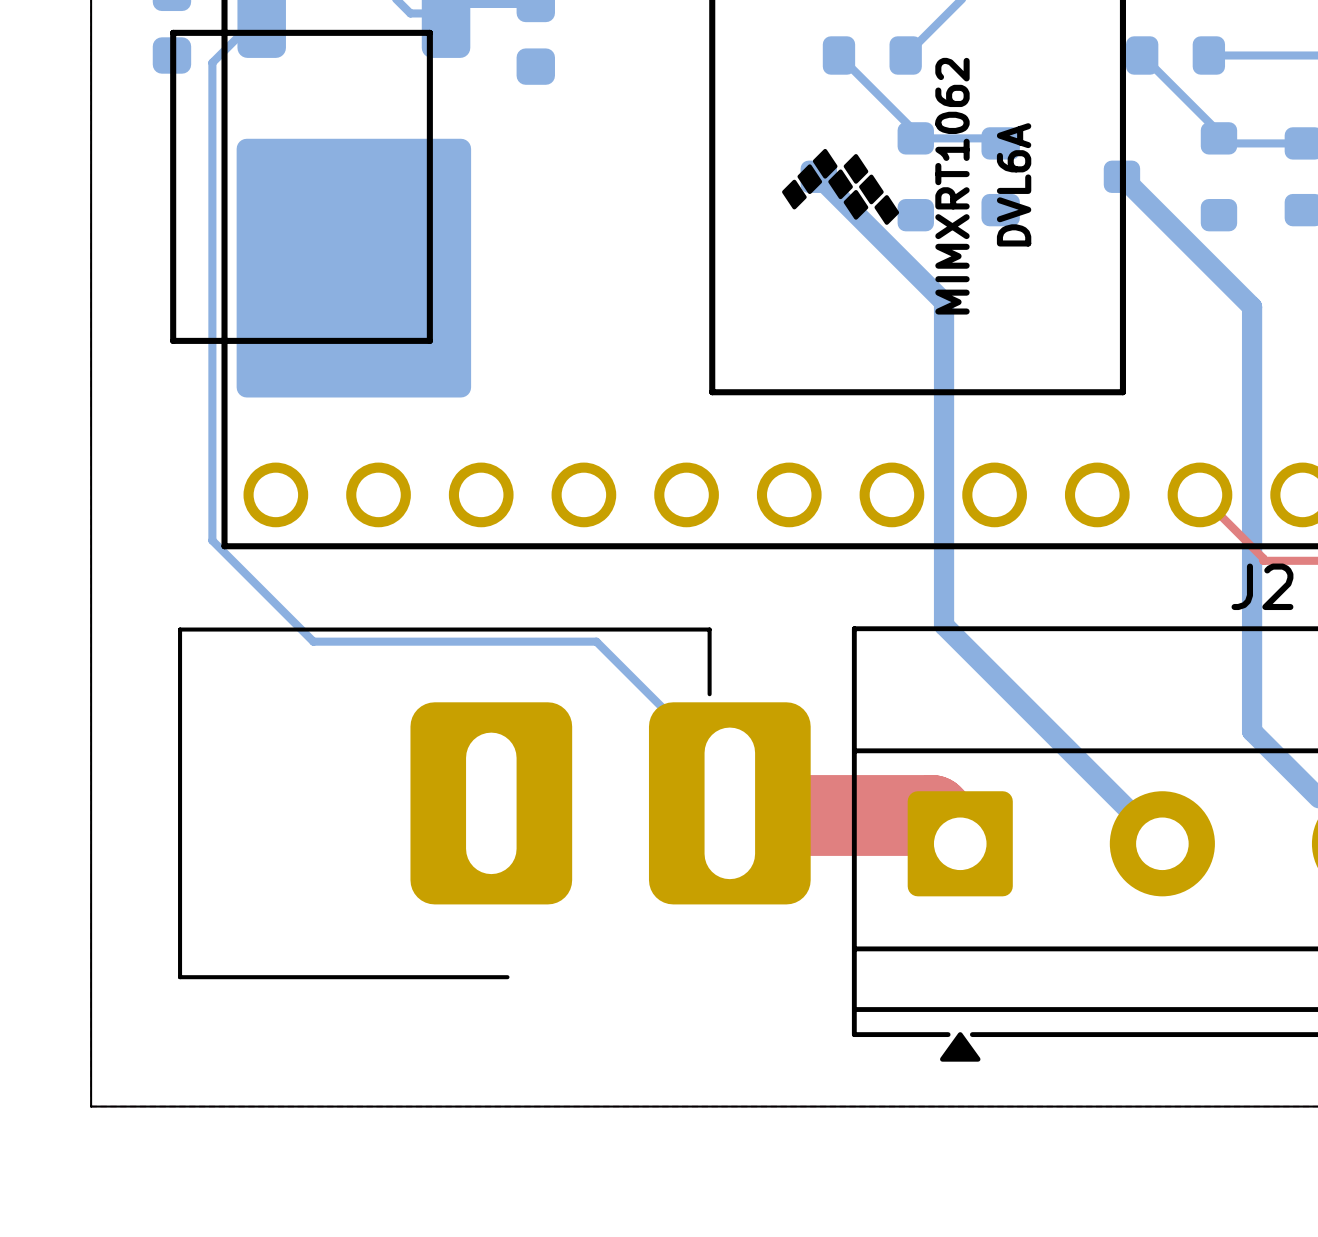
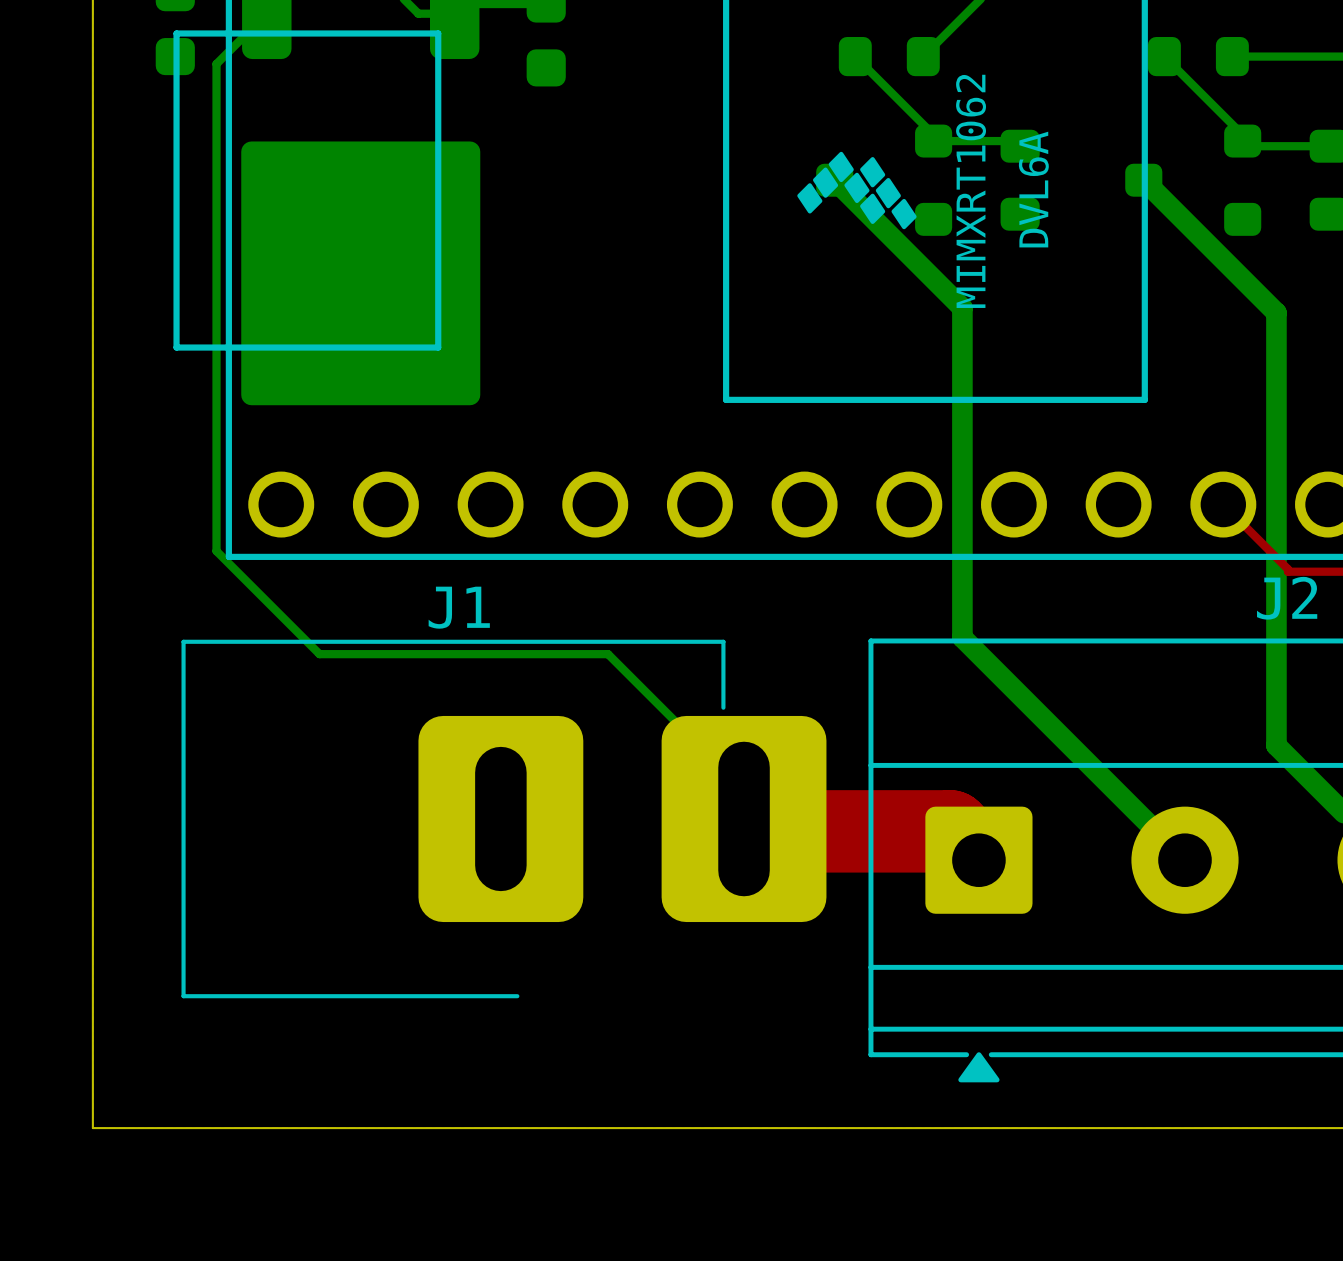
J1 name: none -> J1 (459, 607)

